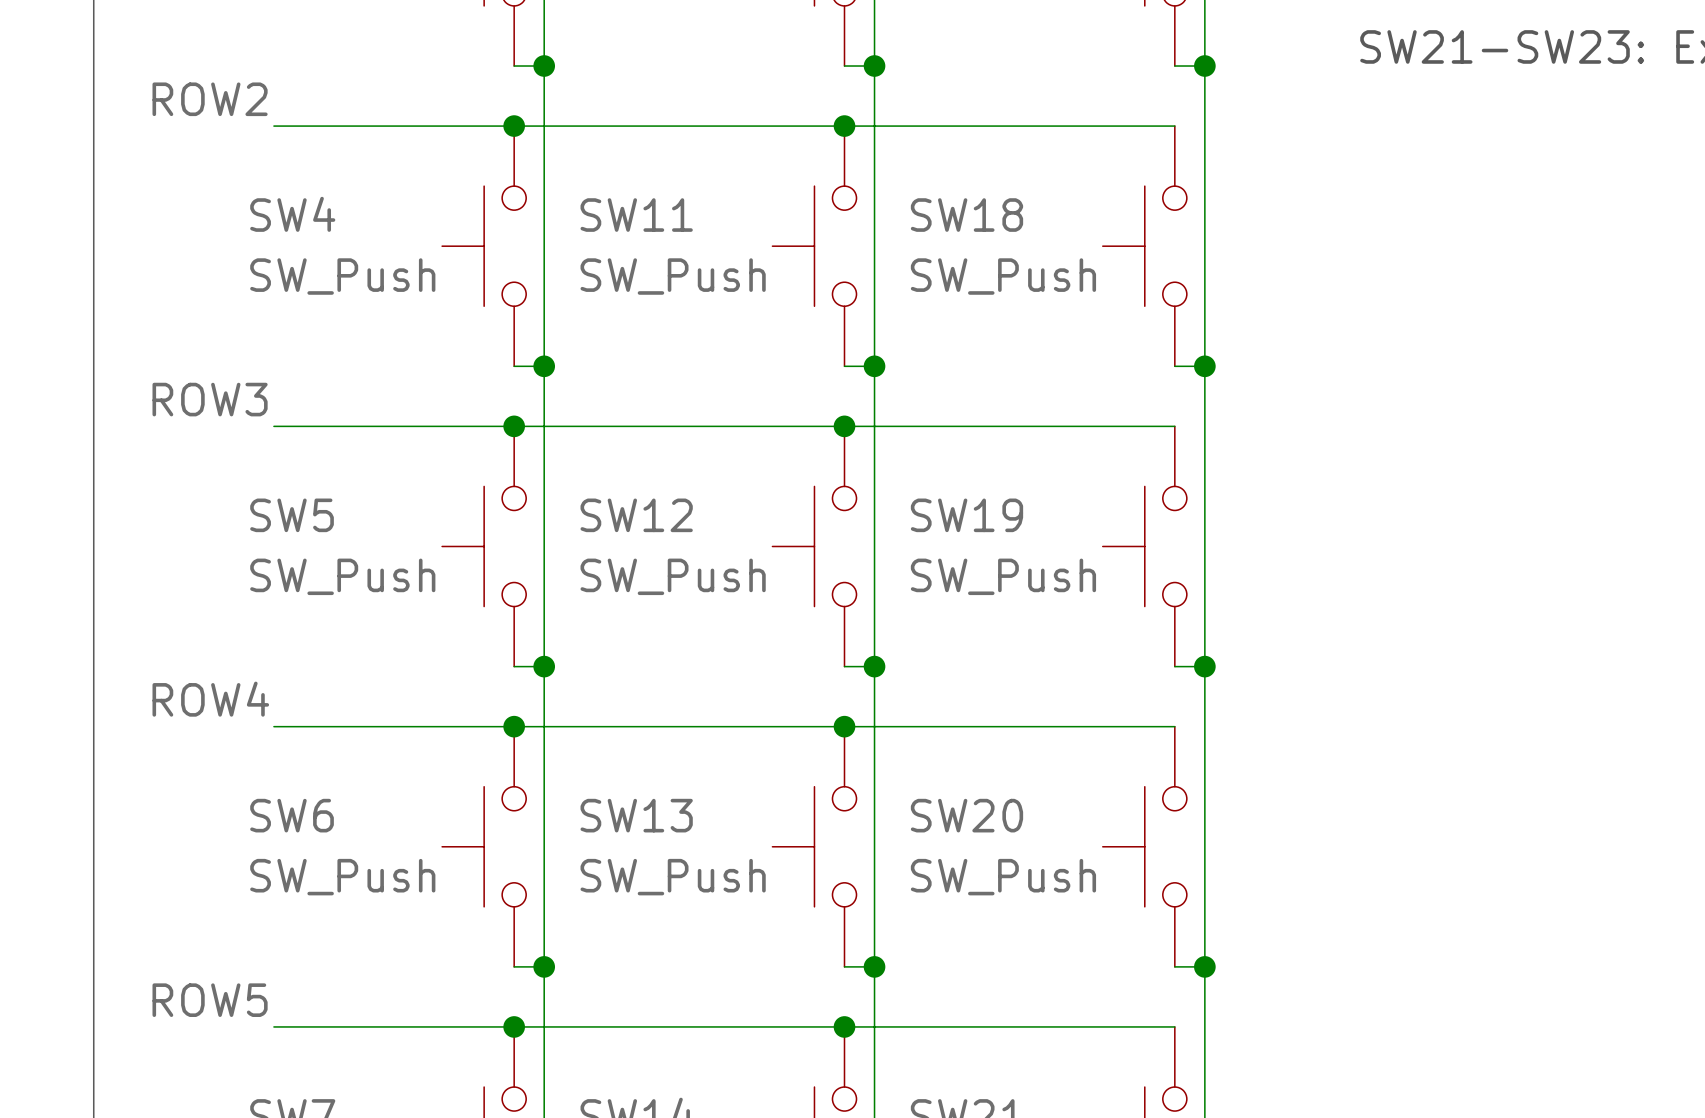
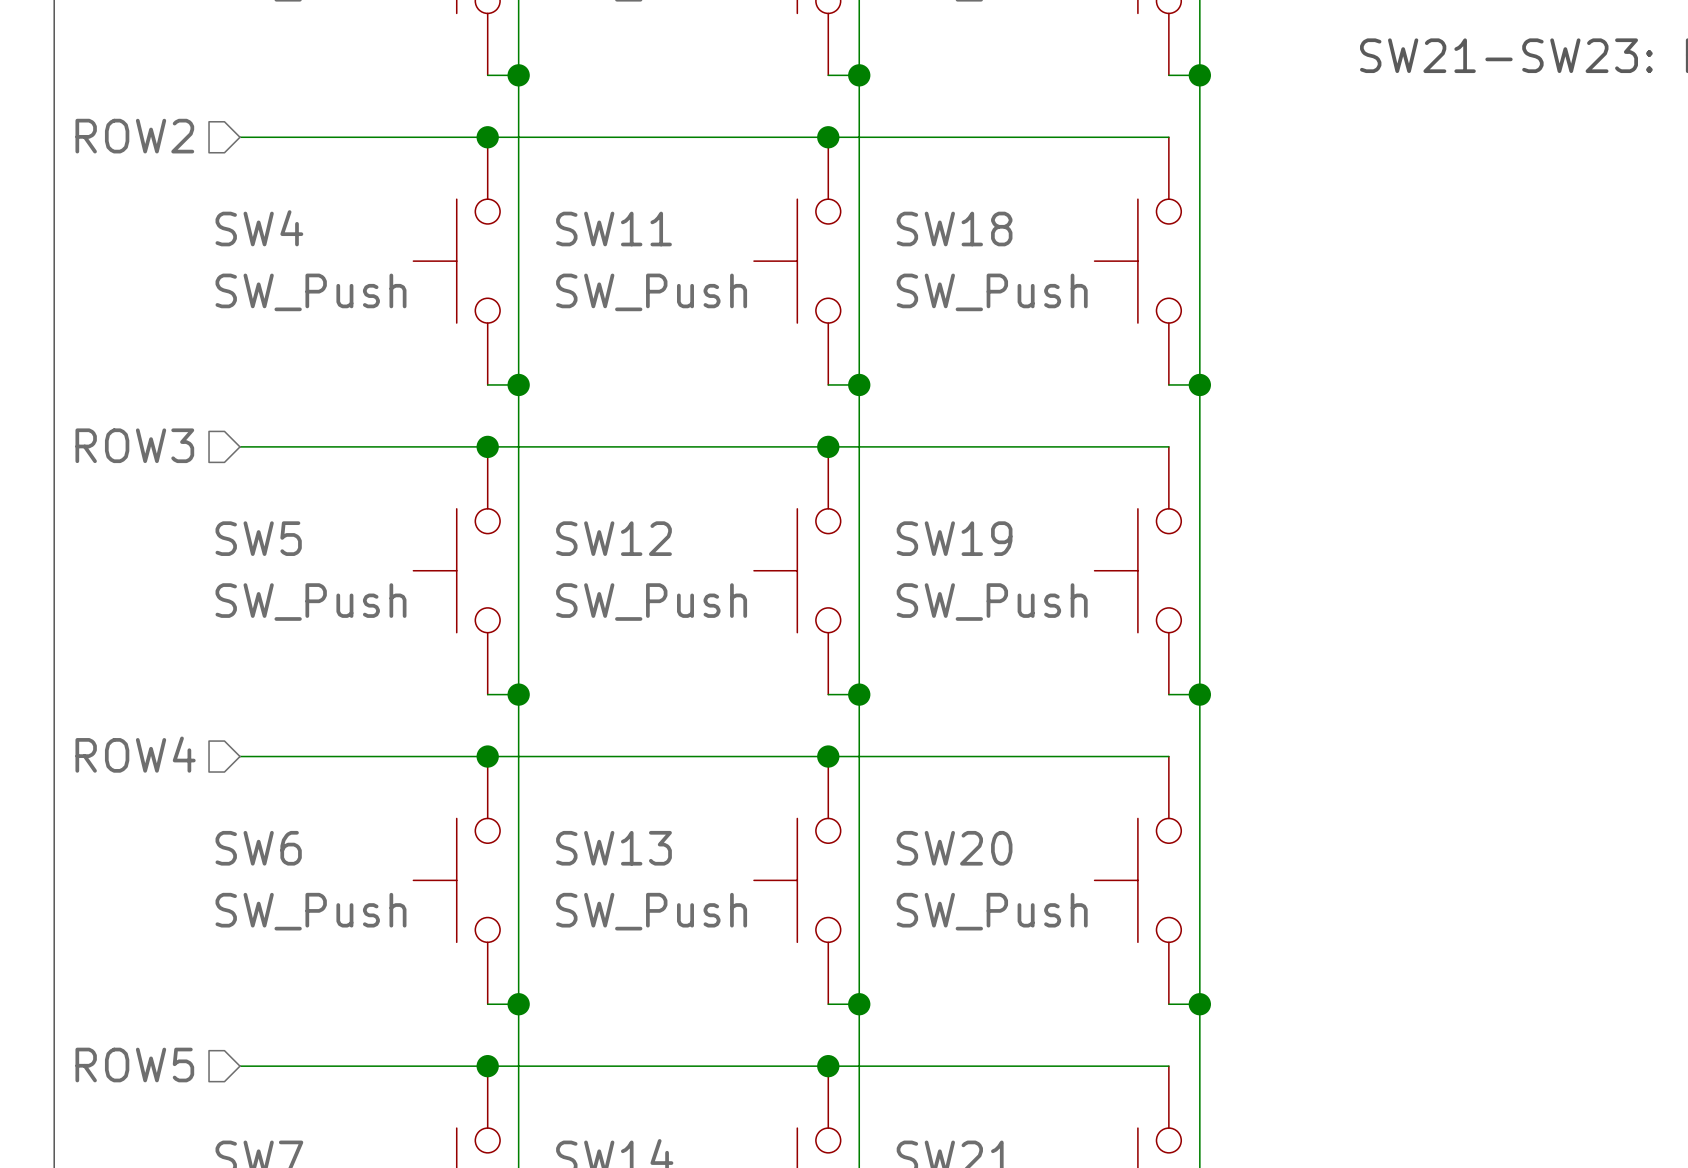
label: ROW2 (210, 99) -> none
hierarchical label: none -> ROW2 (134, 136)
label: ROW3 (210, 399) -> none
hierarchical label: none -> ROW3 (134, 445)
label: ROW4 (210, 699) -> none
hierarchical label: none -> ROW4 (135, 754)
label: ROW5 (210, 1000) -> none
hierarchical label: none -> ROW5 (134, 1065)

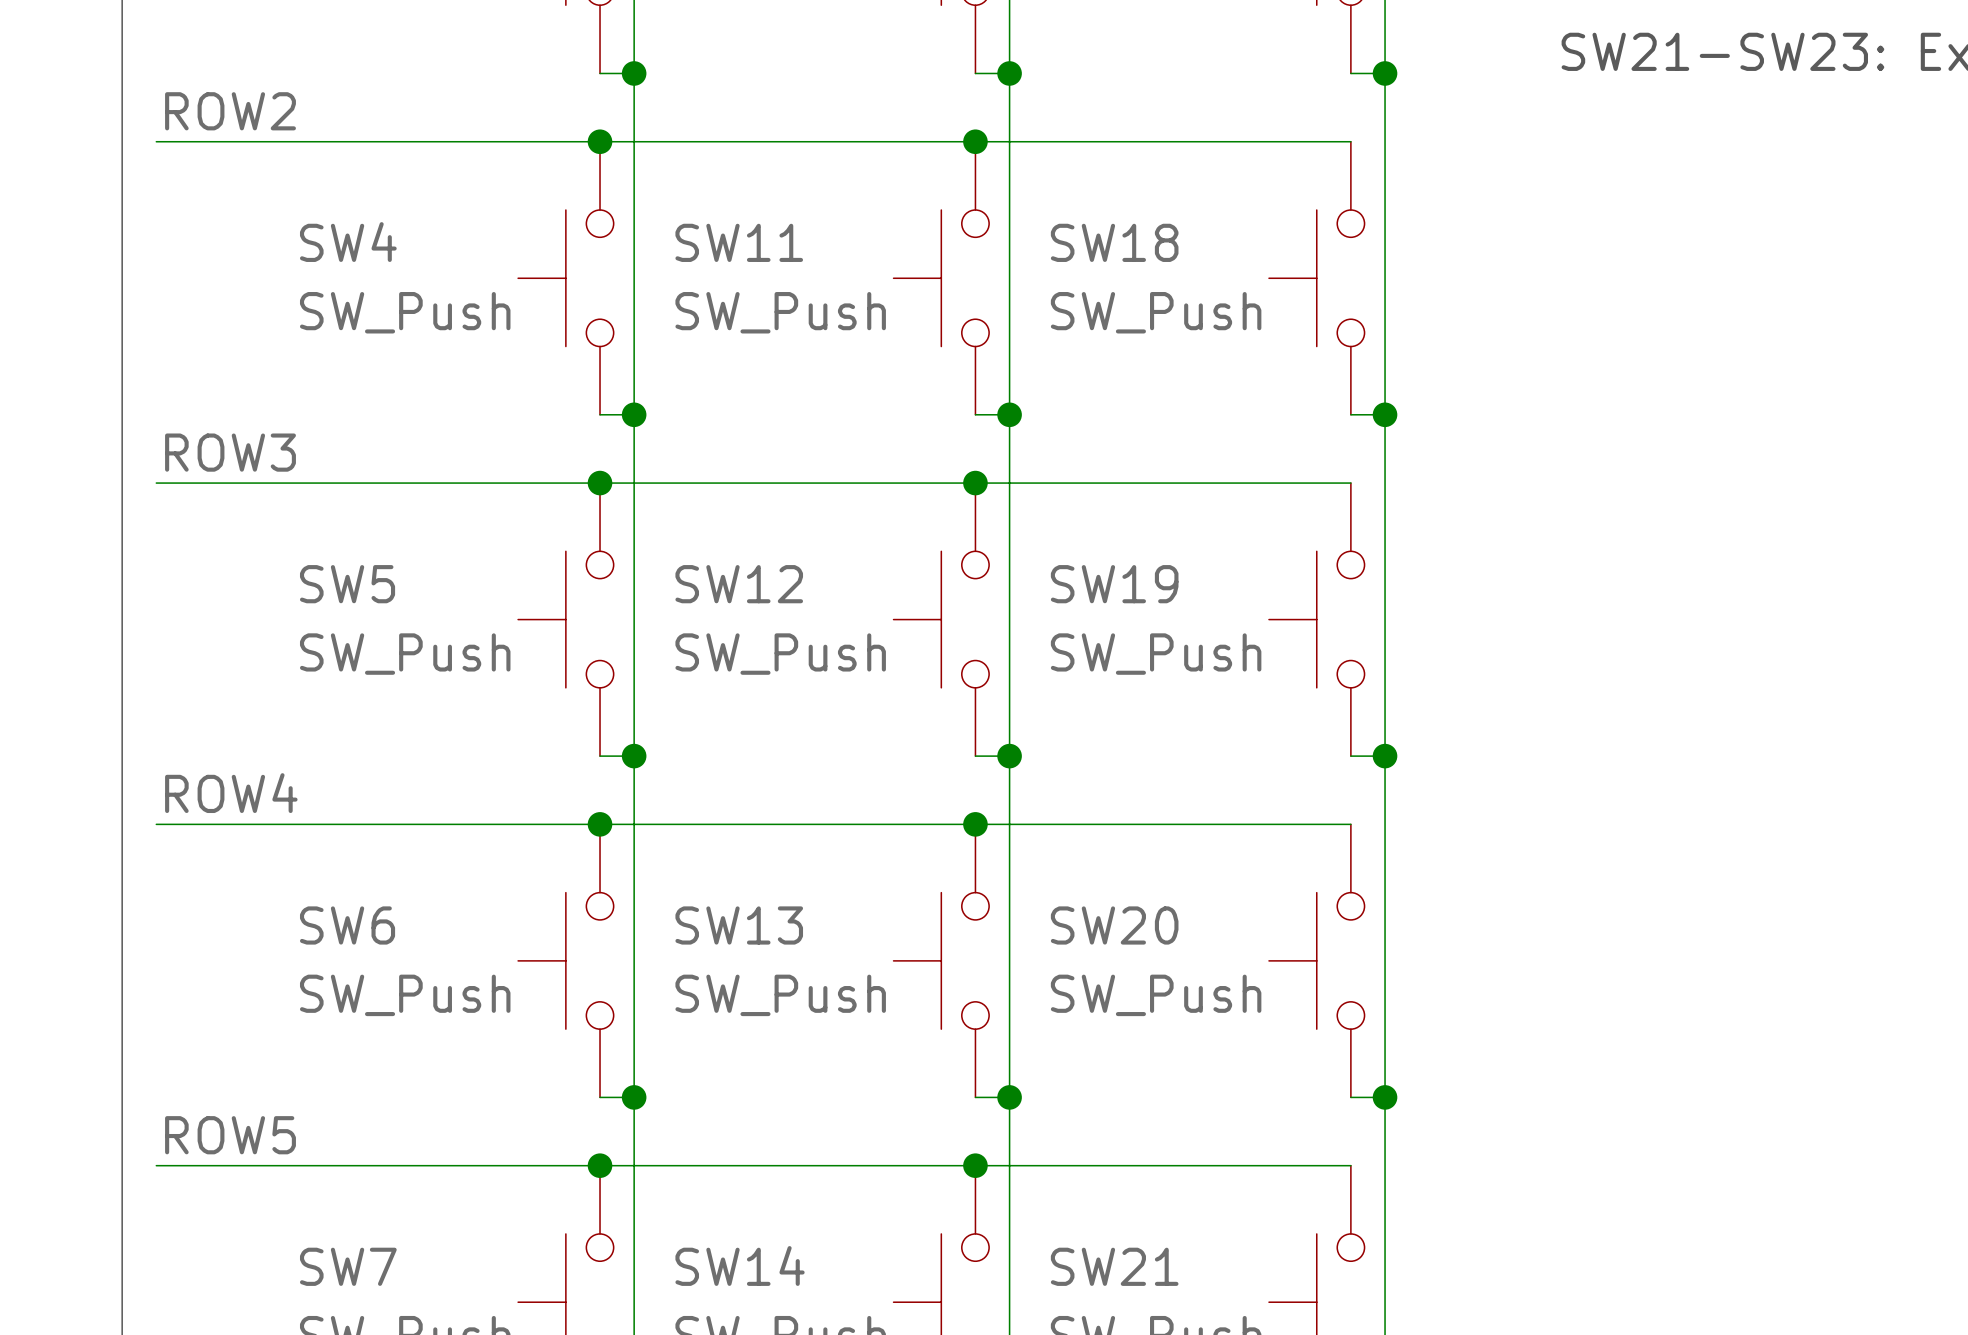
label: none -> ROW2 (230, 111)
hierarchical label: ROW2 (134, 136) -> none
wire: none -> (156, 141) (326, 141)
label: none -> ROW3 (230, 452)
hierarchical label: ROW3 (134, 445) -> none
wire: none -> (156, 483) (326, 483)
label: none -> ROW4 (231, 793)
hierarchical label: ROW4 (135, 754) -> none
wire: none -> (156, 824) (326, 824)
label: none -> ROW5 (230, 1135)
hierarchical label: ROW5 (134, 1065) -> none
wire: none -> (156, 1165) (326, 1165)

